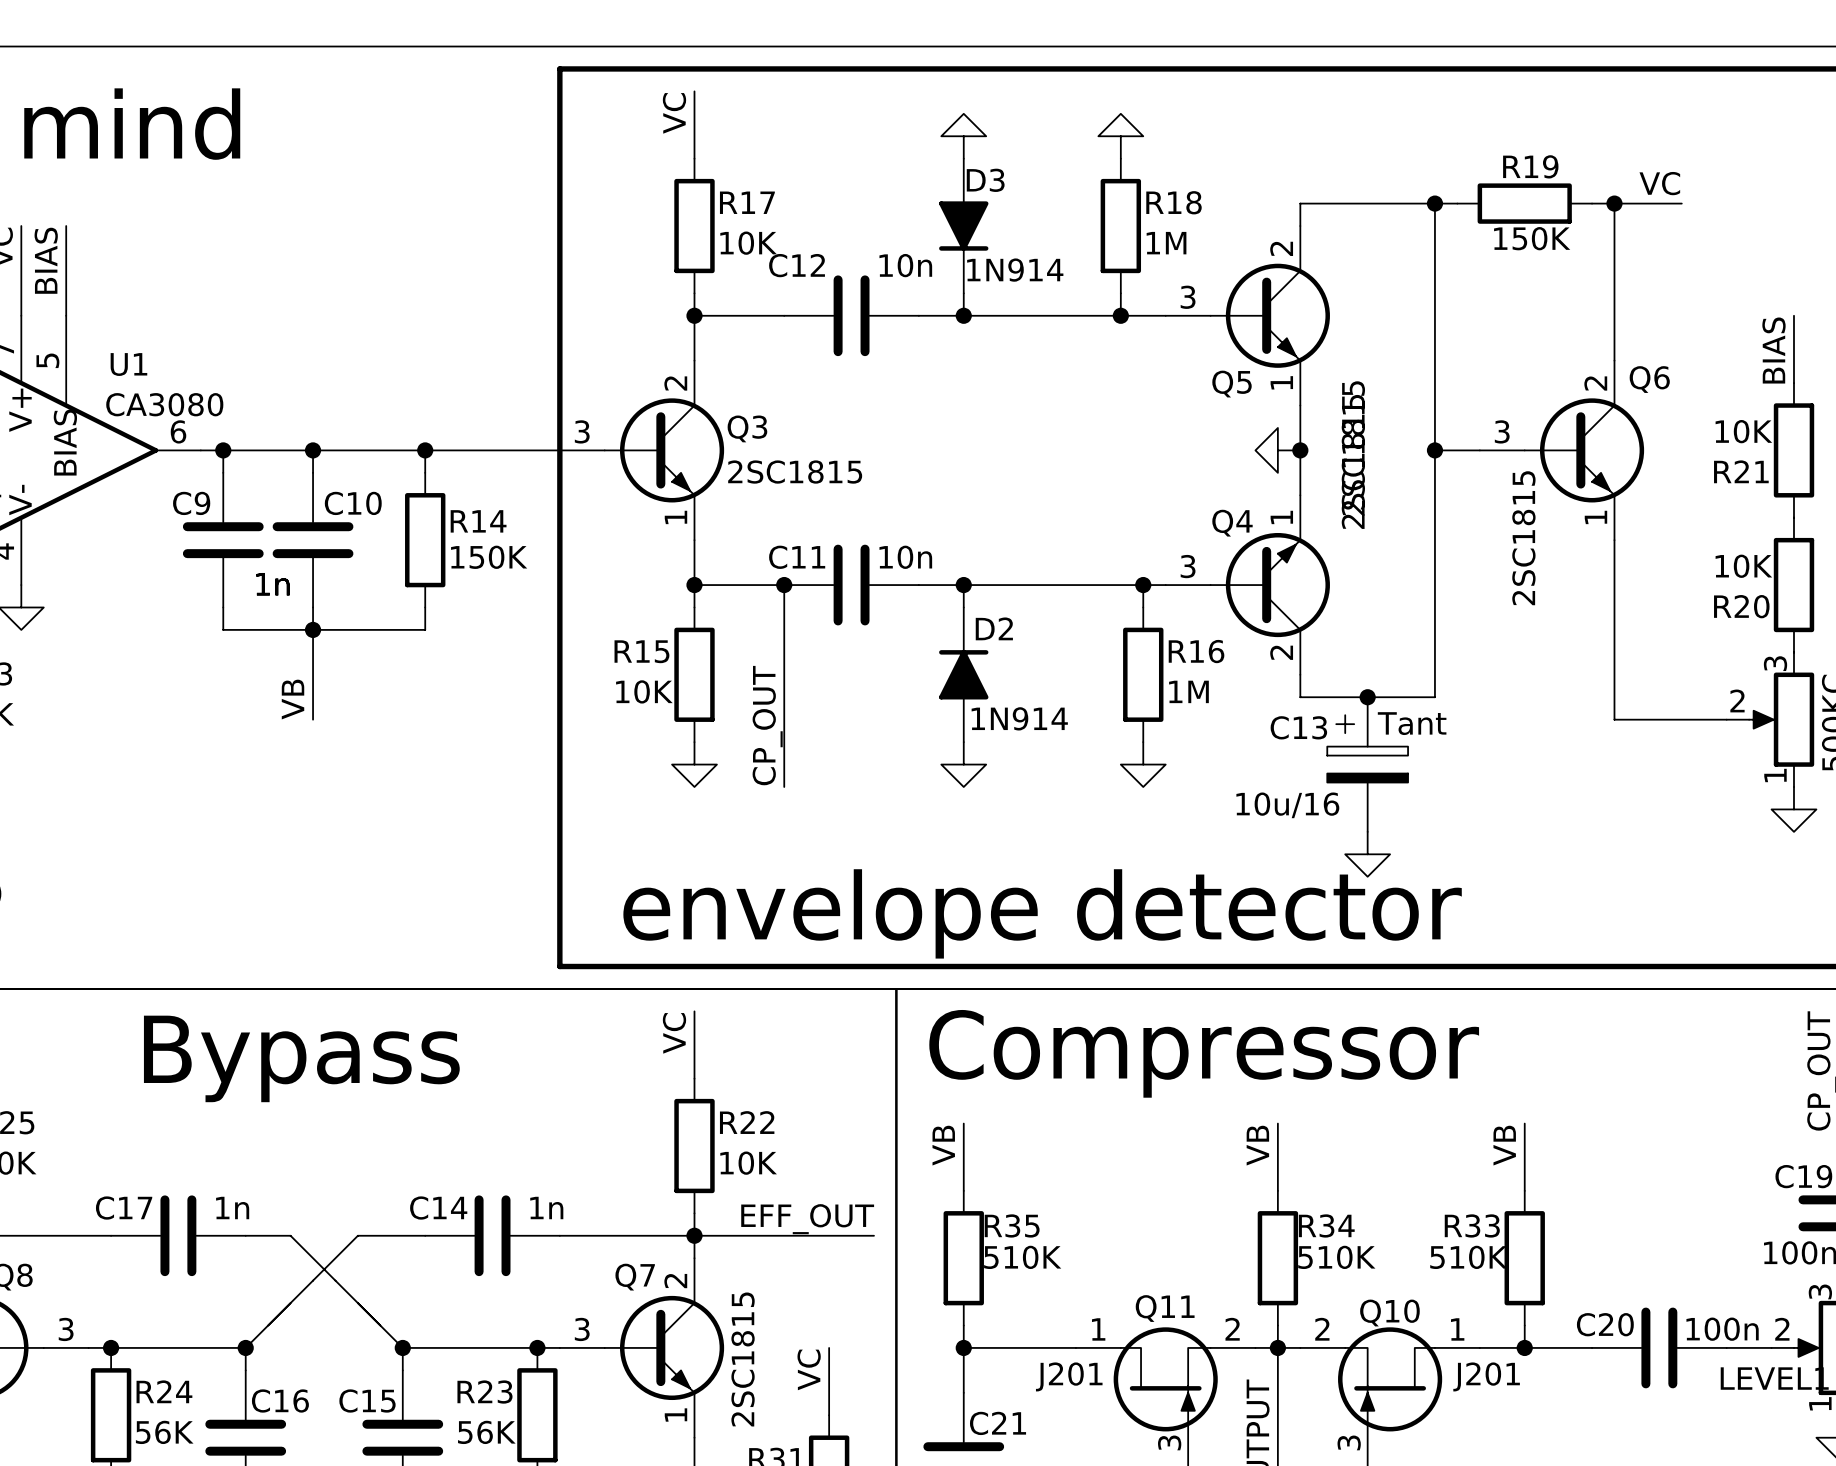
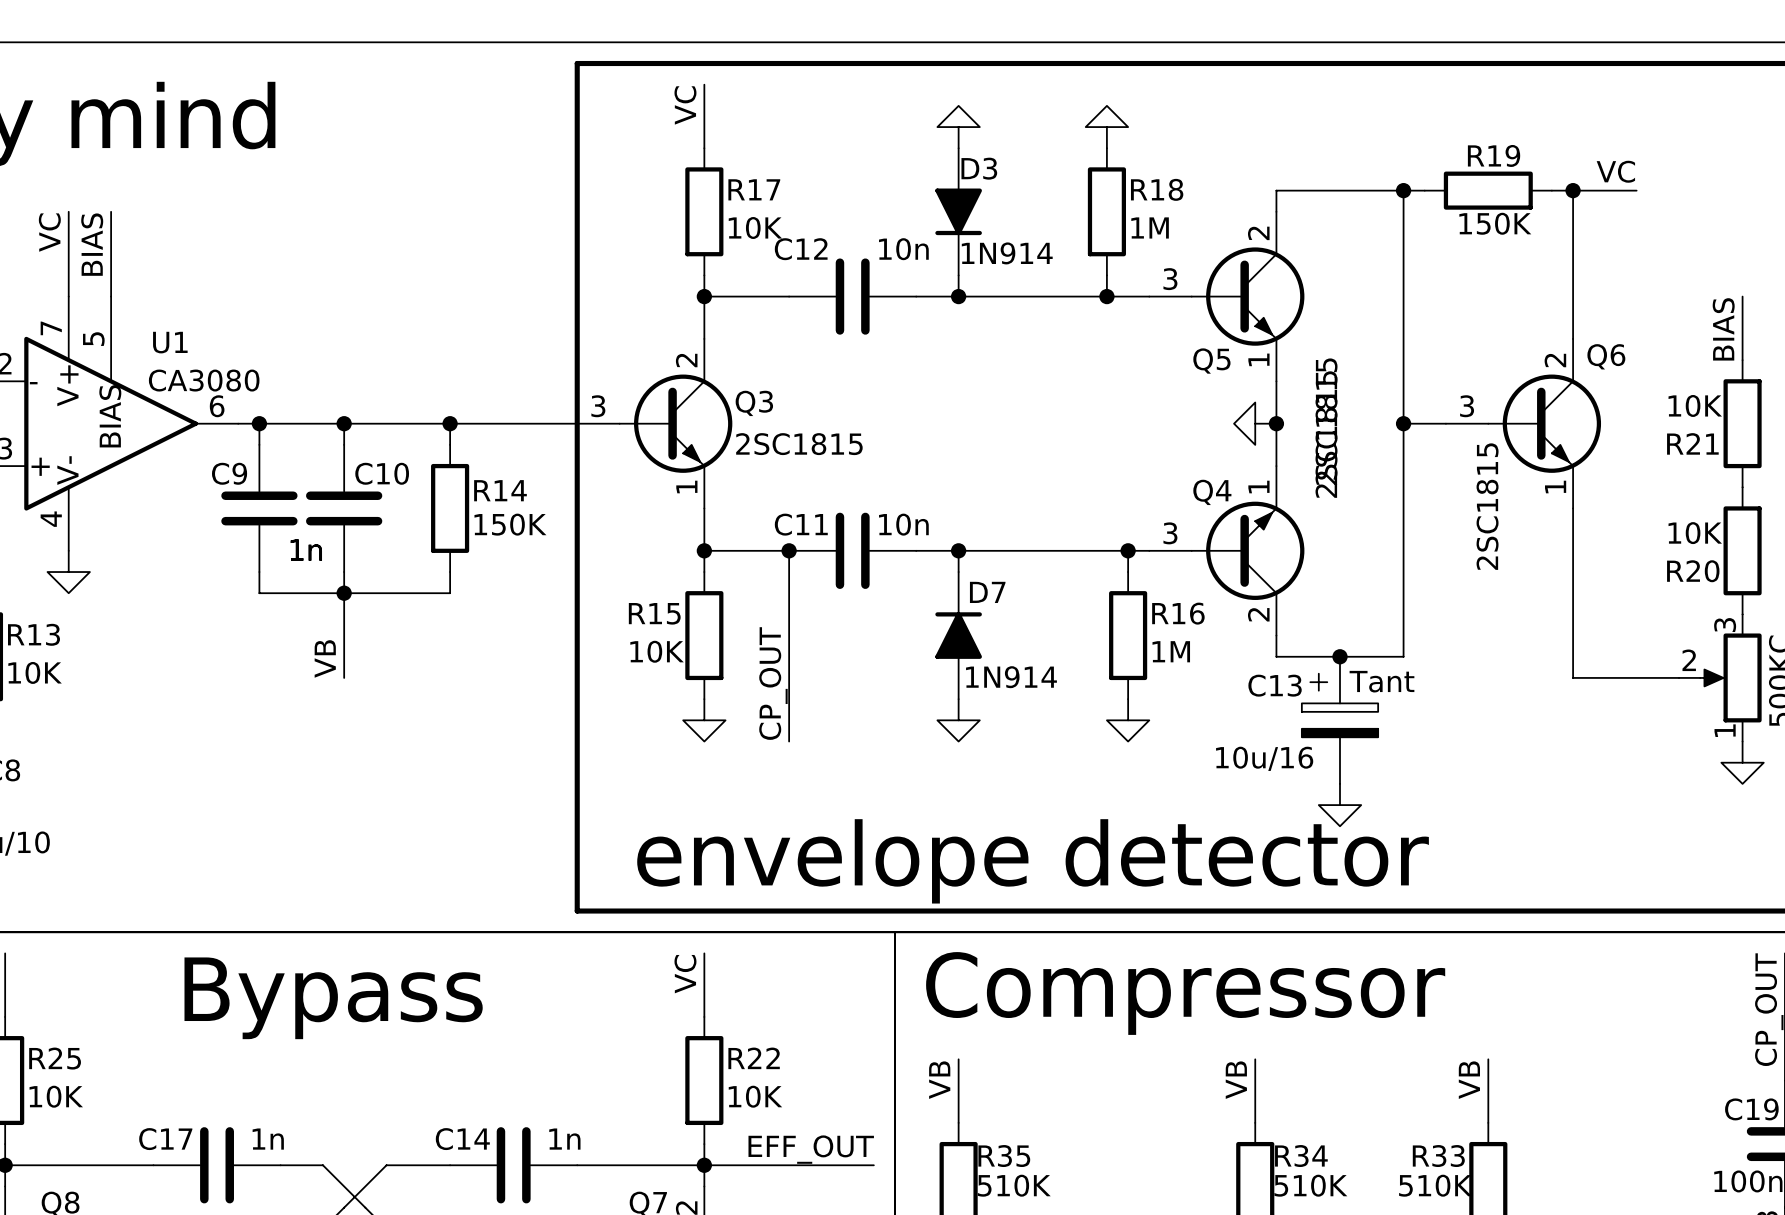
D2 name: D2 (994, 628) -> D7 (987, 592)

